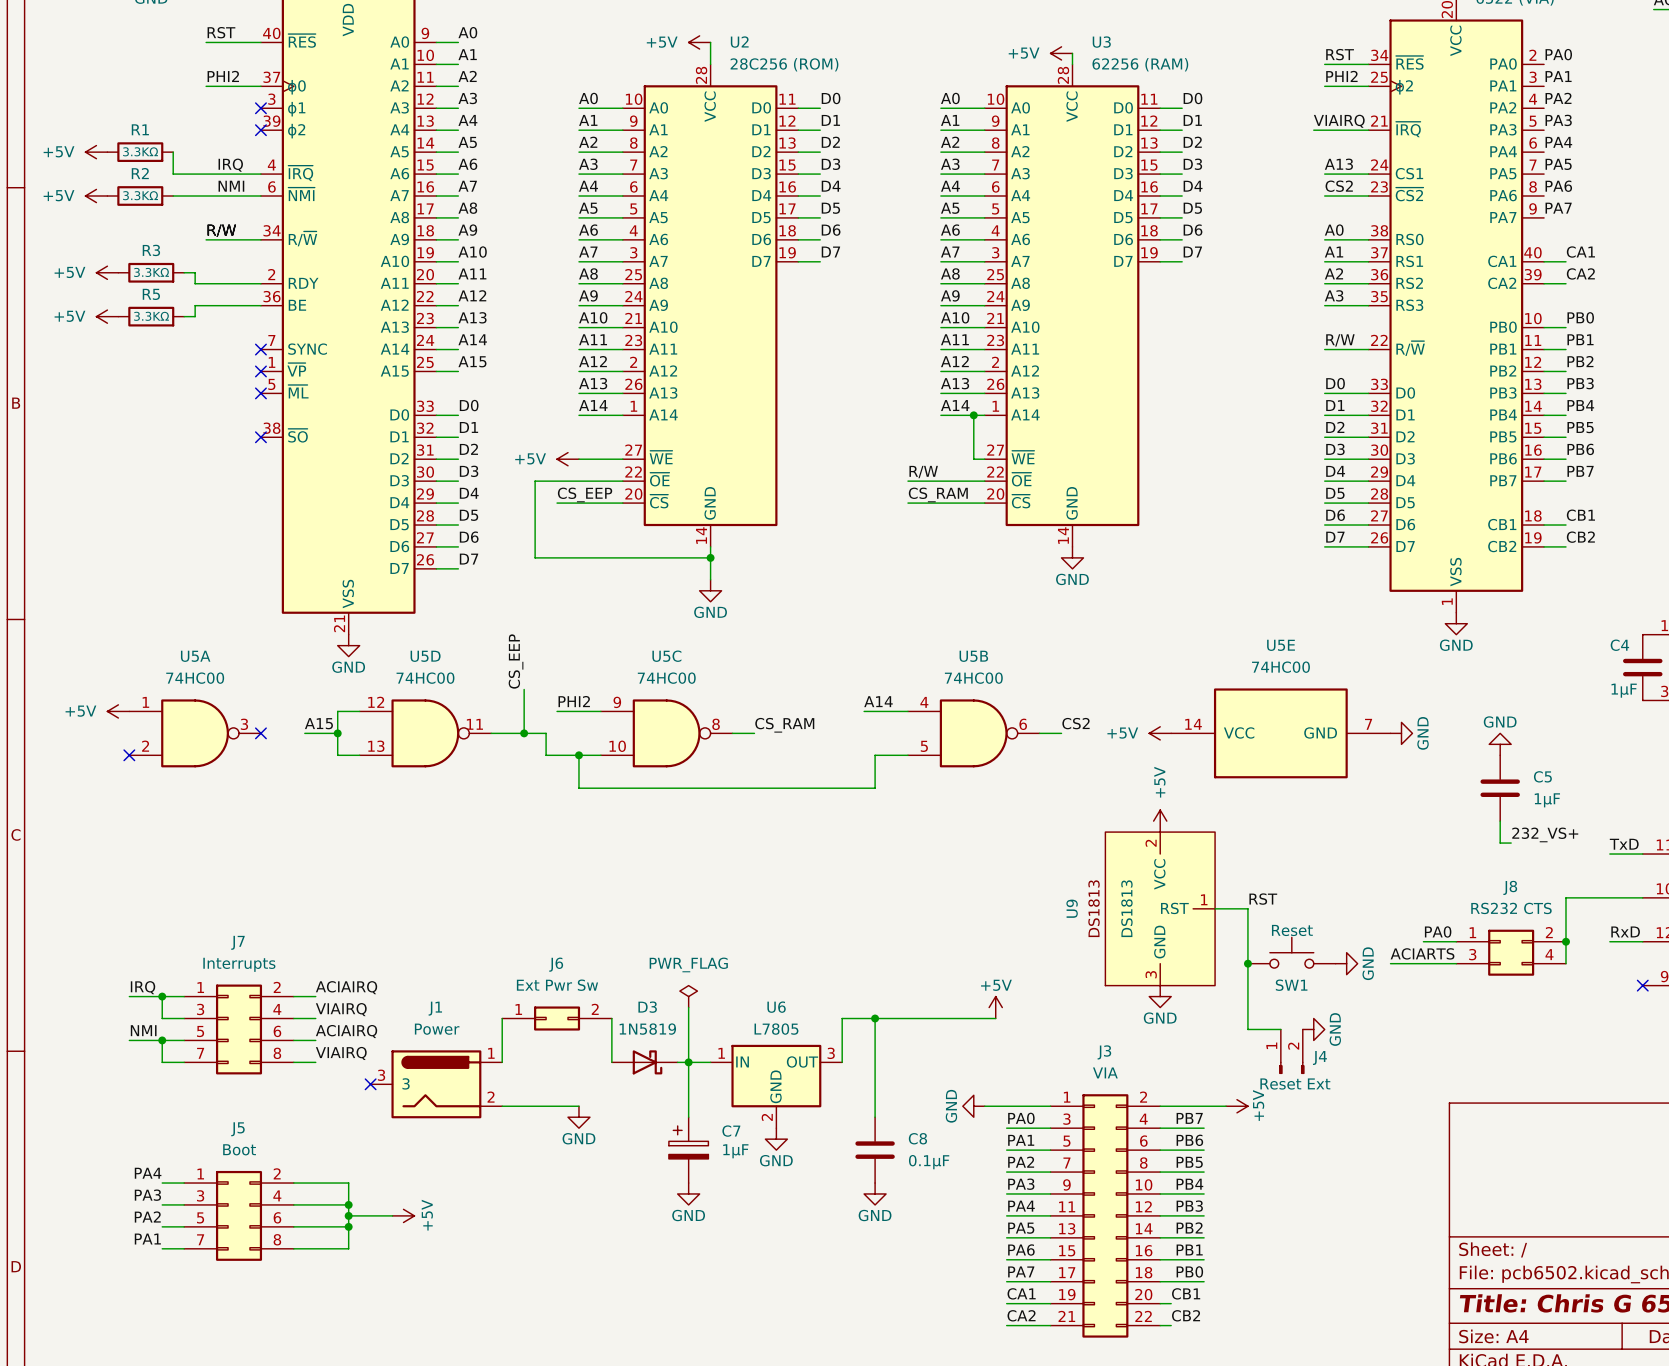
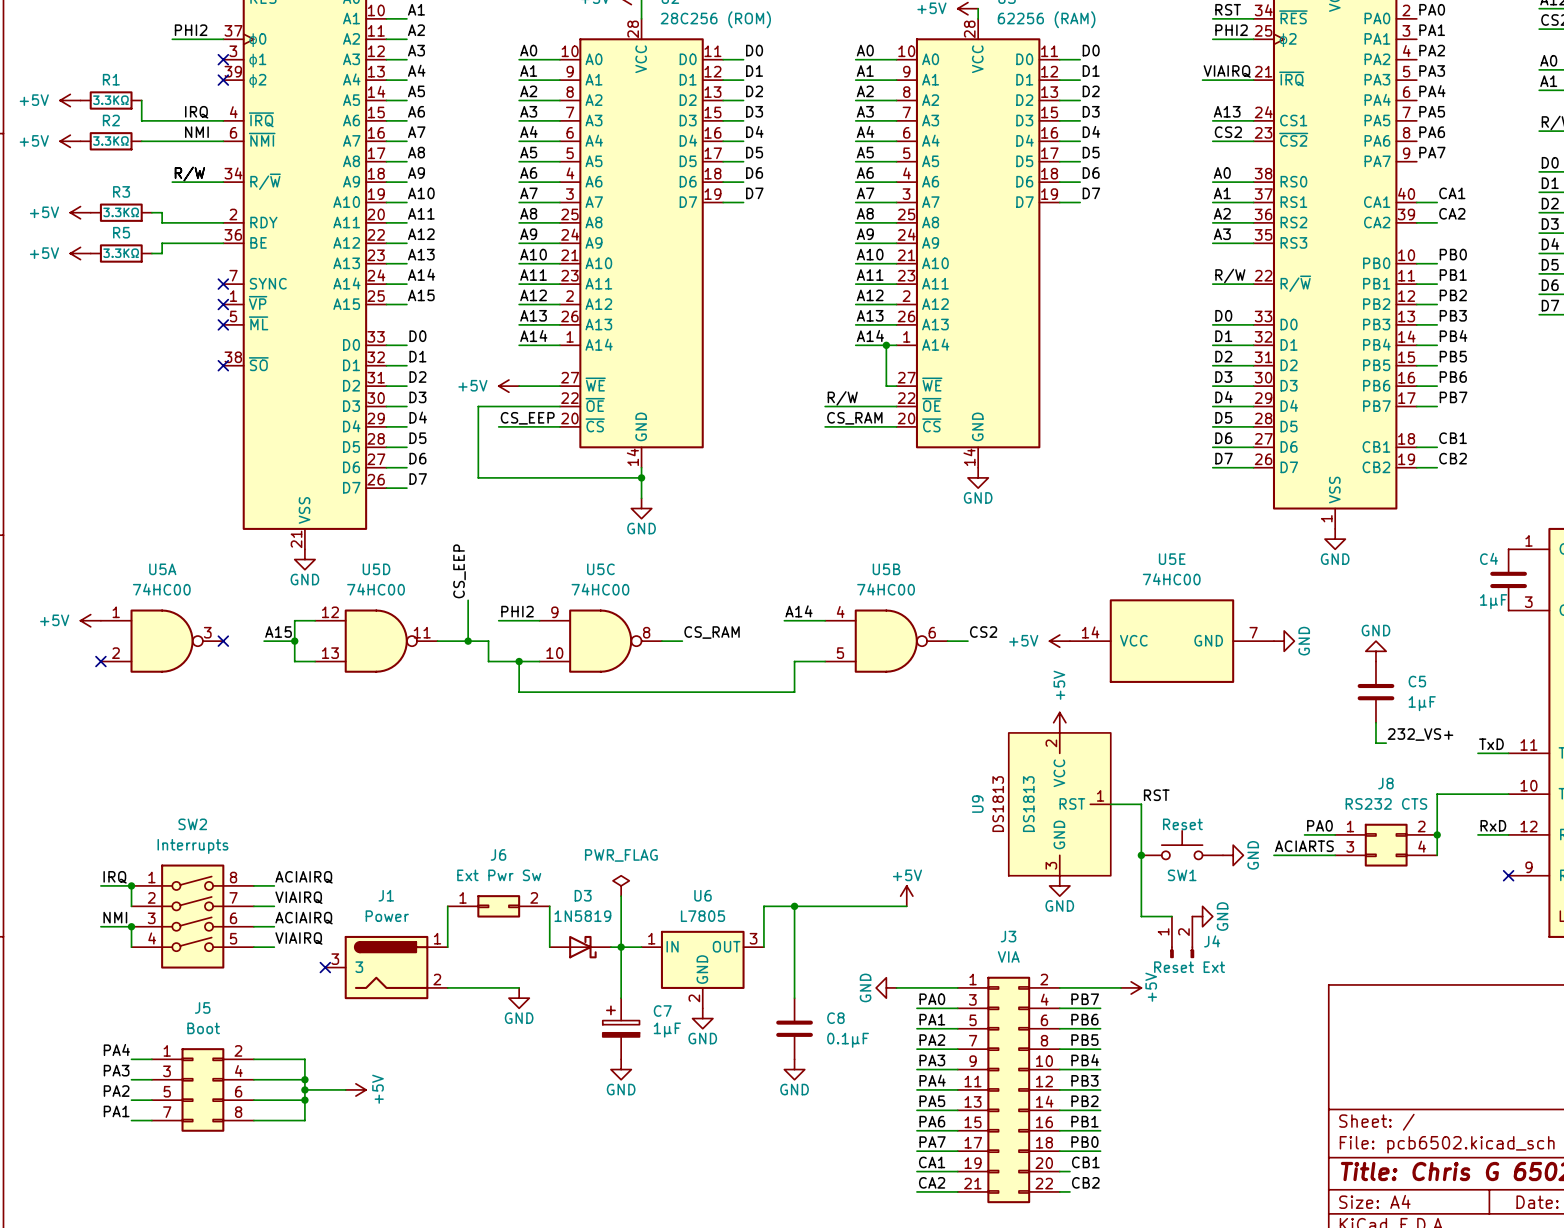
SW2: none -> Interrupts (192, 916)
J7: Interrupts (239, 1029) -> none

